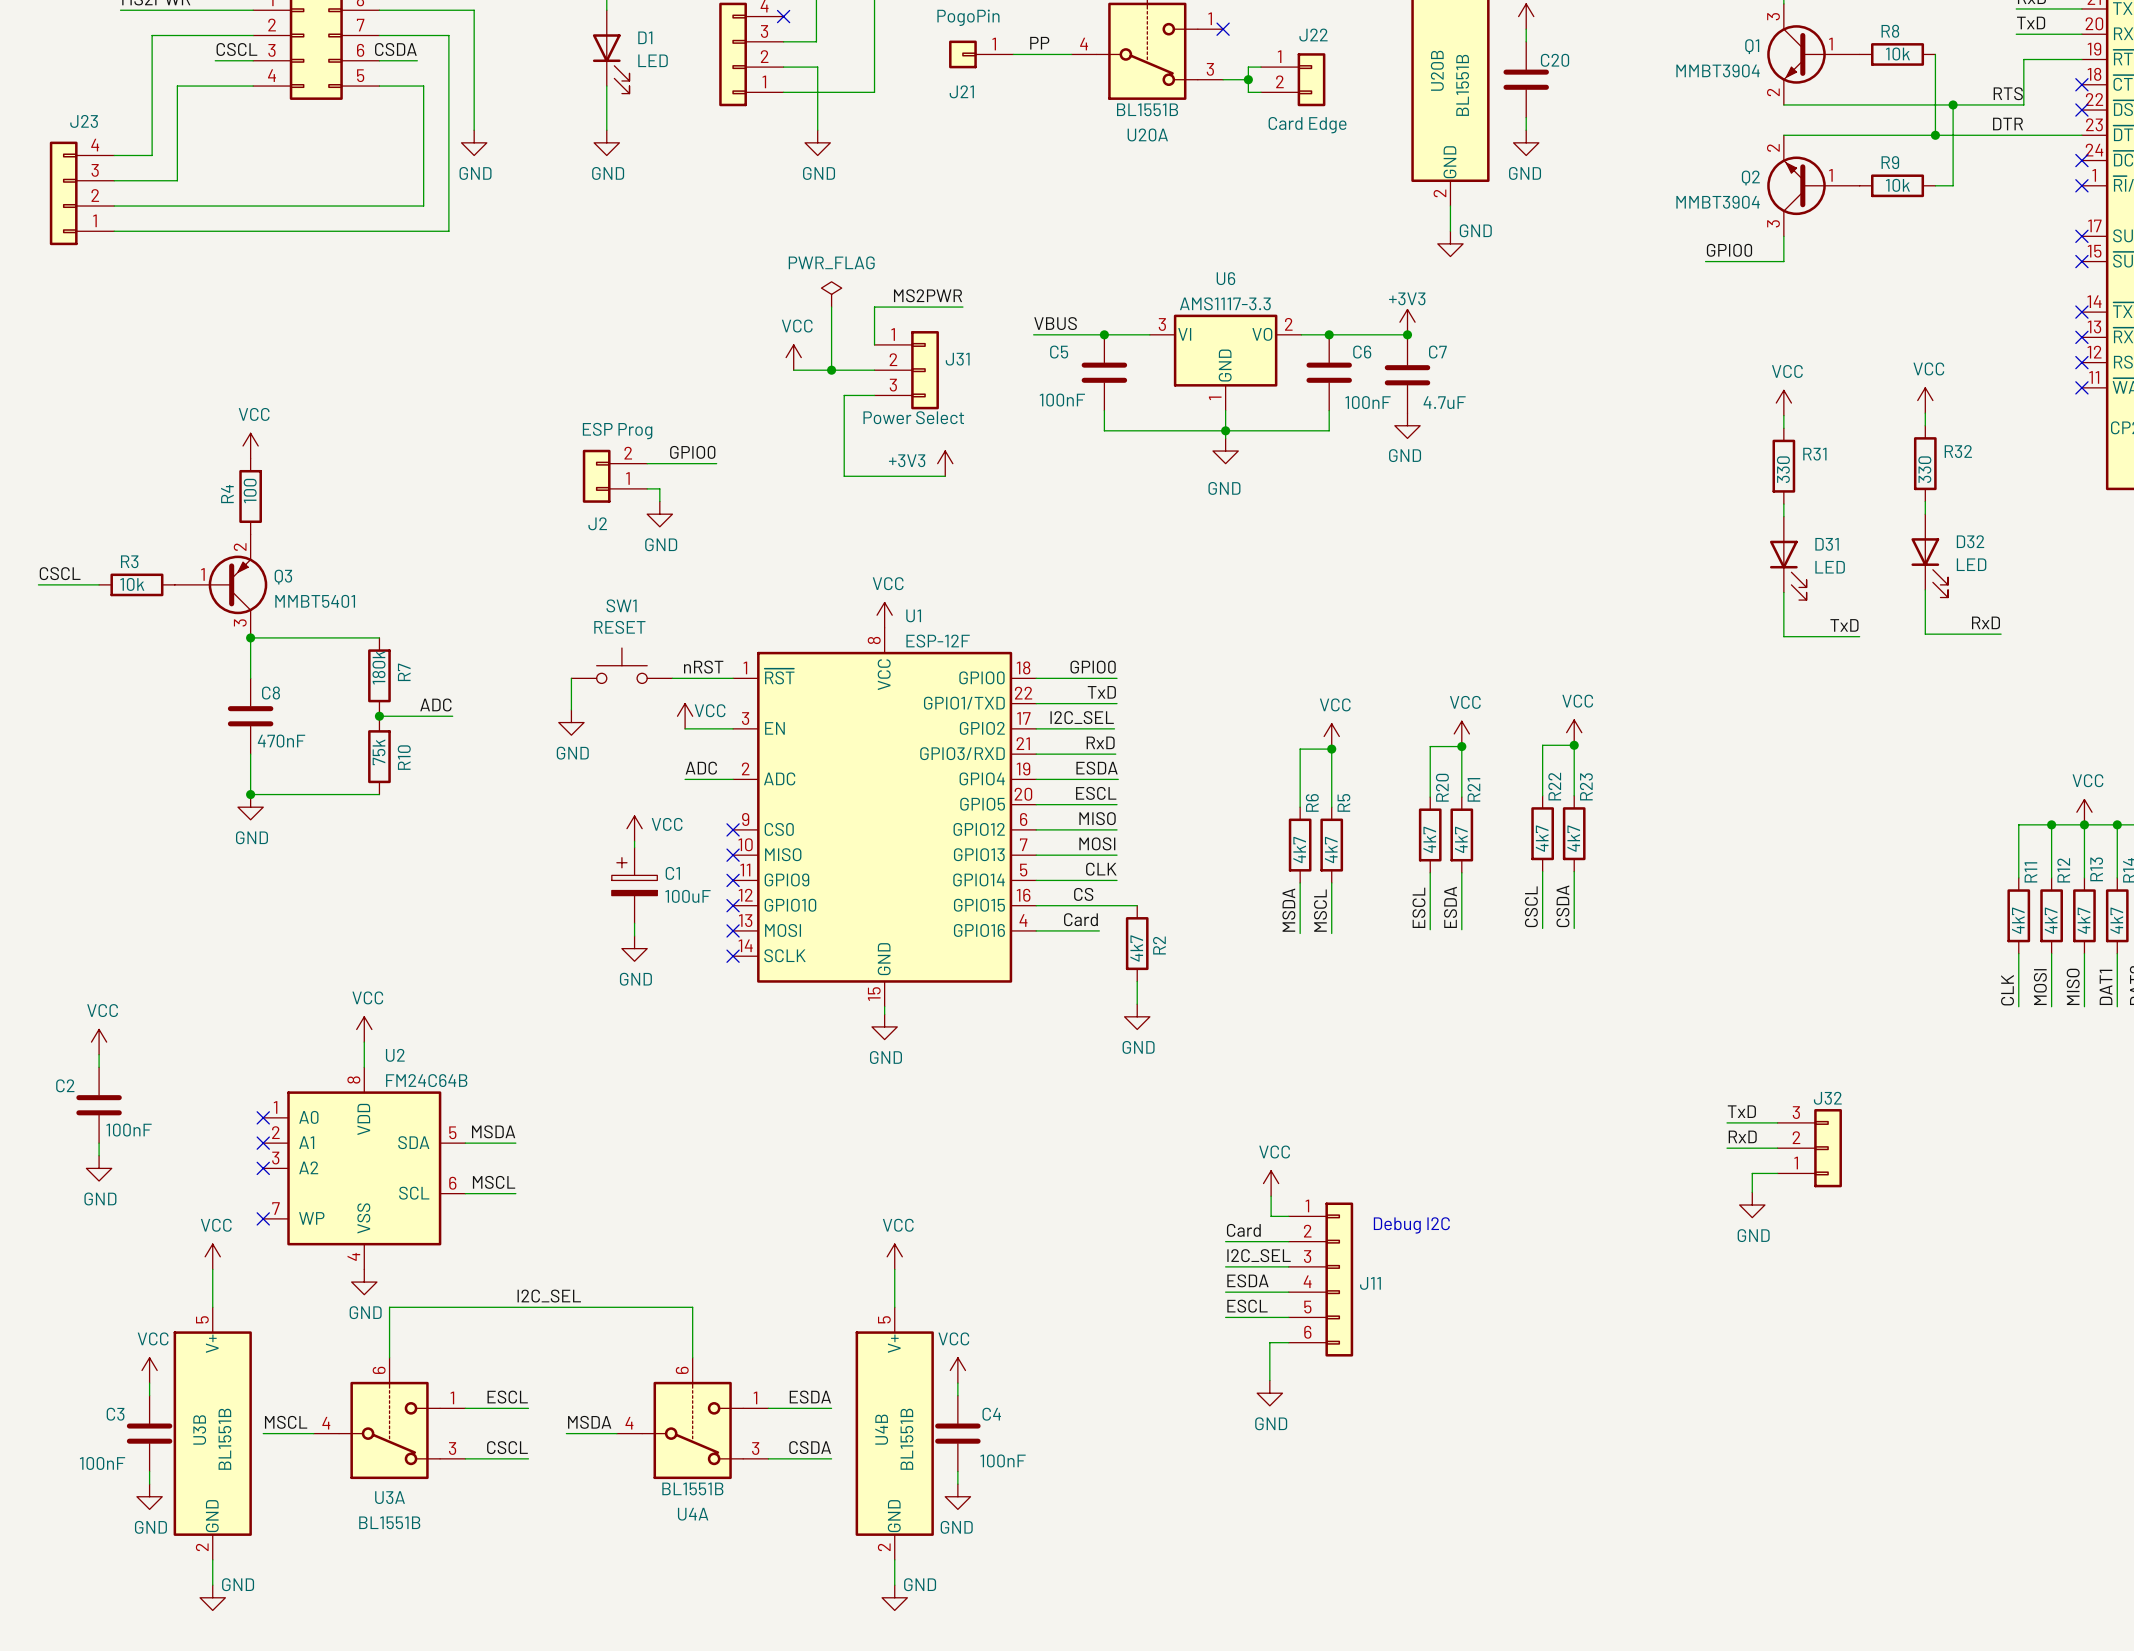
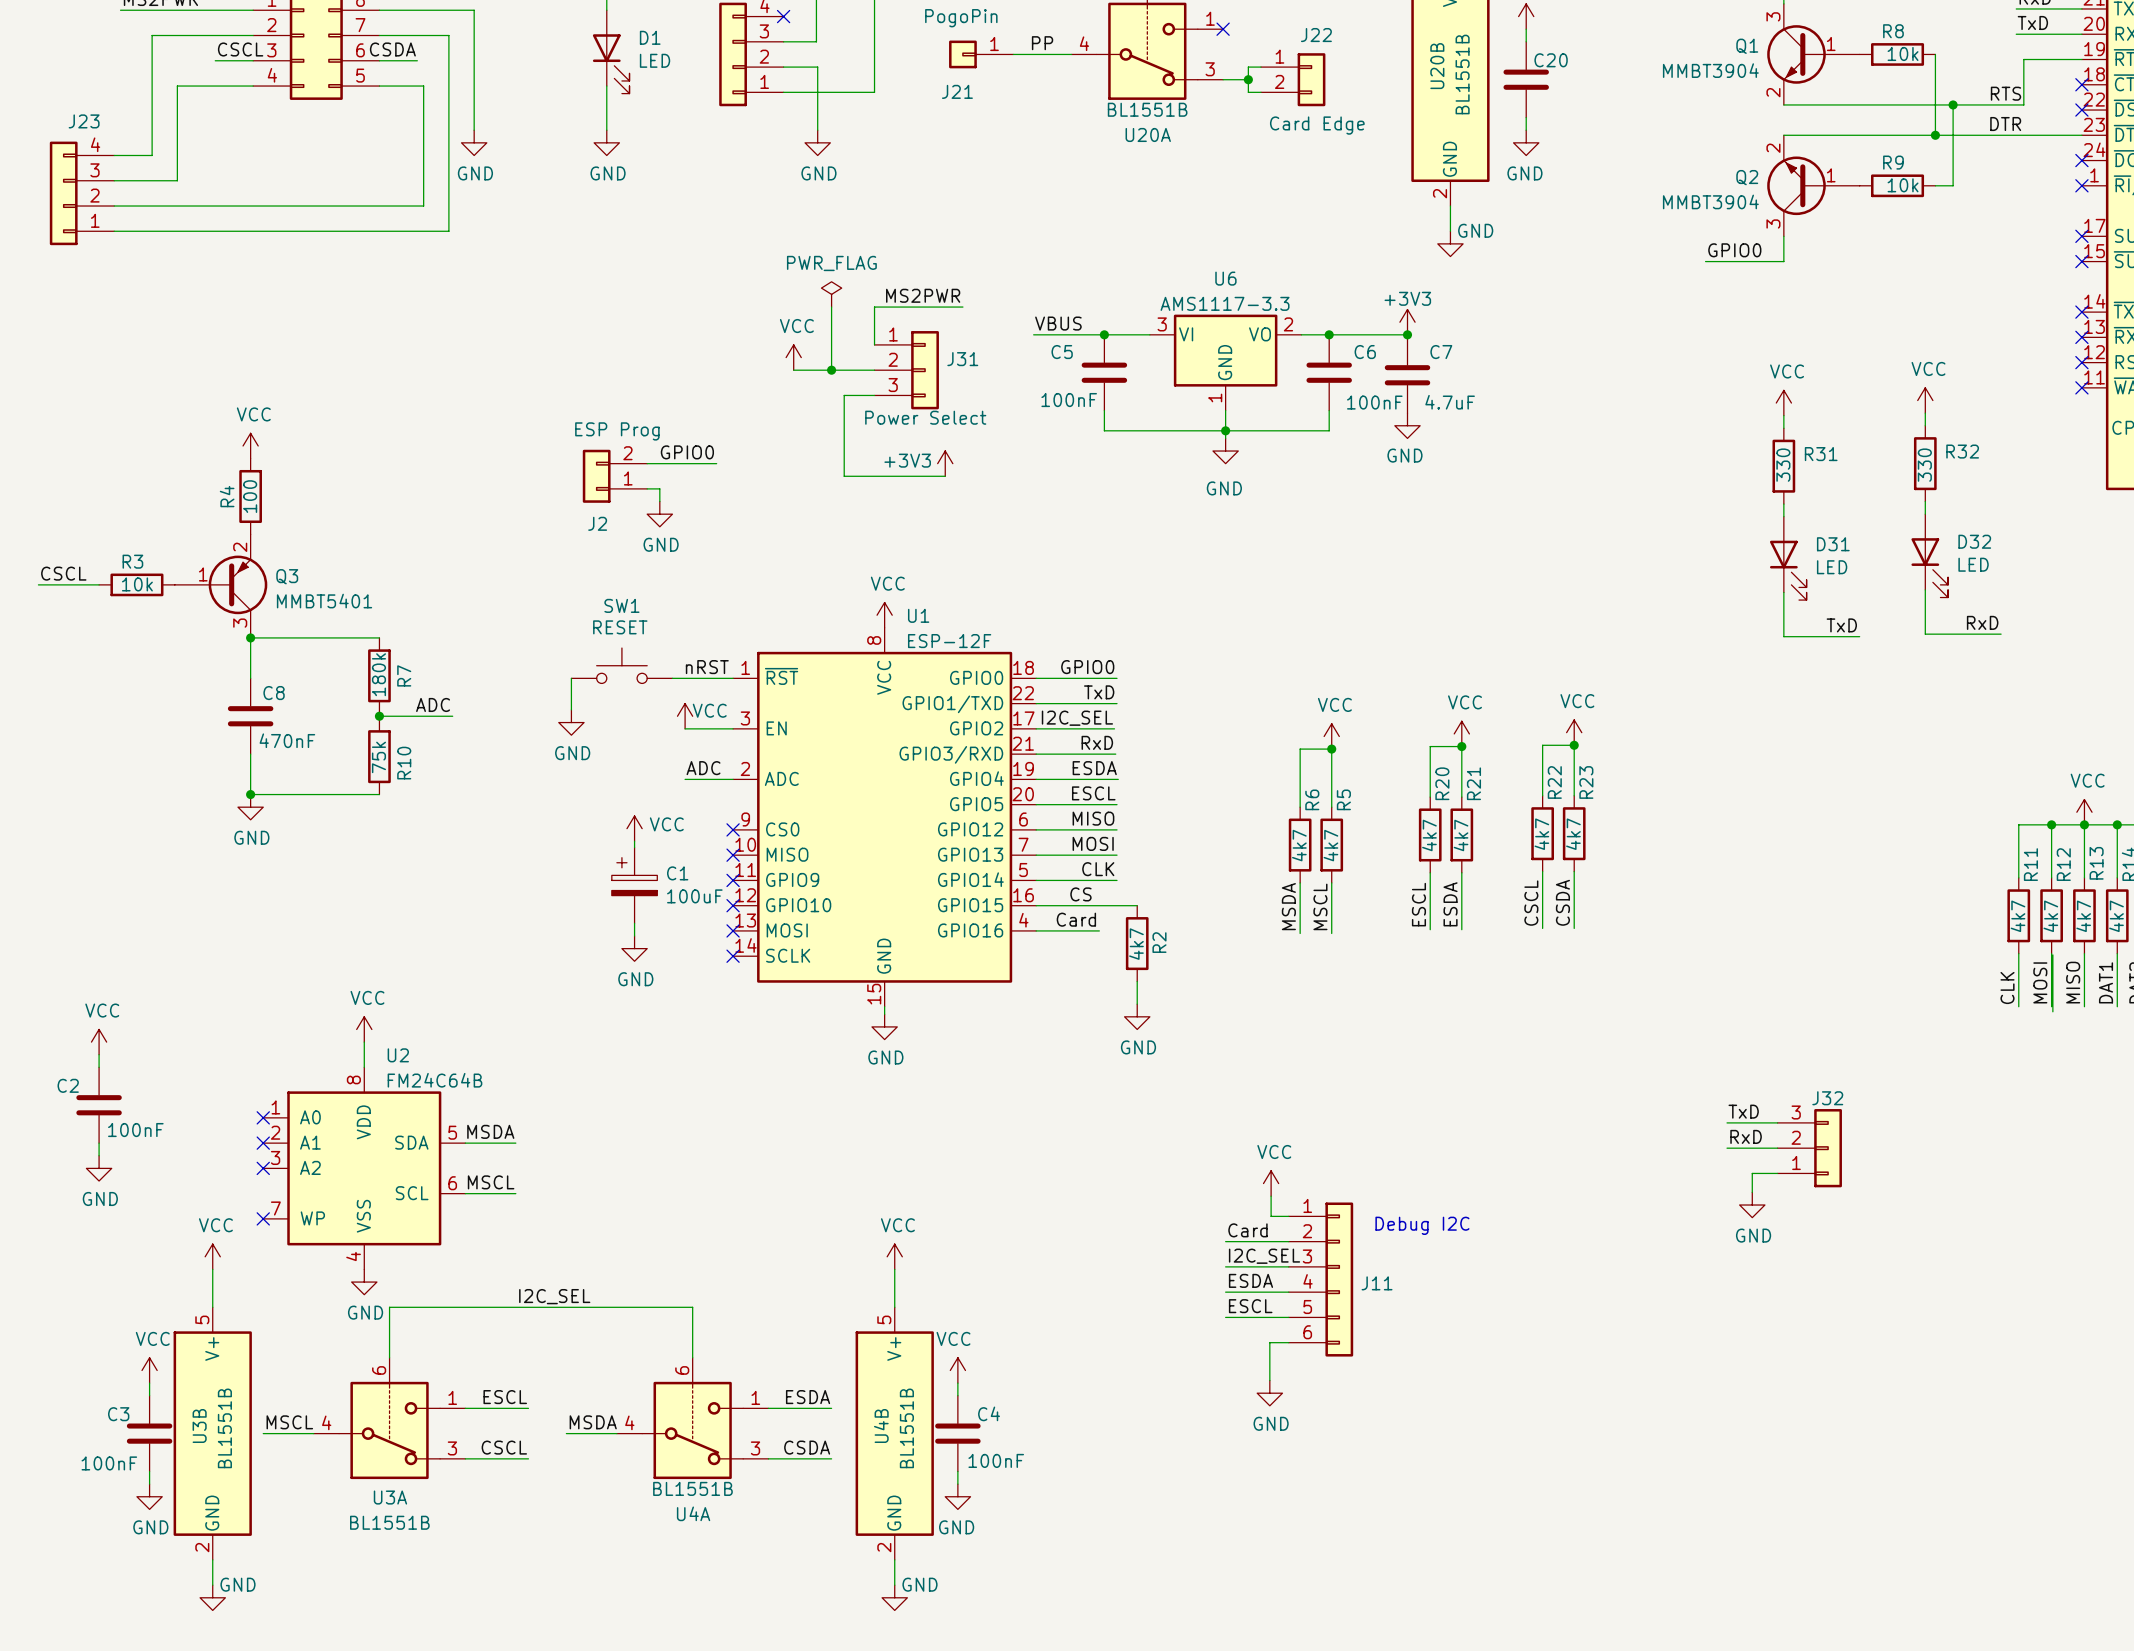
wire: none -> (2052, 954) (2052, 1011)

